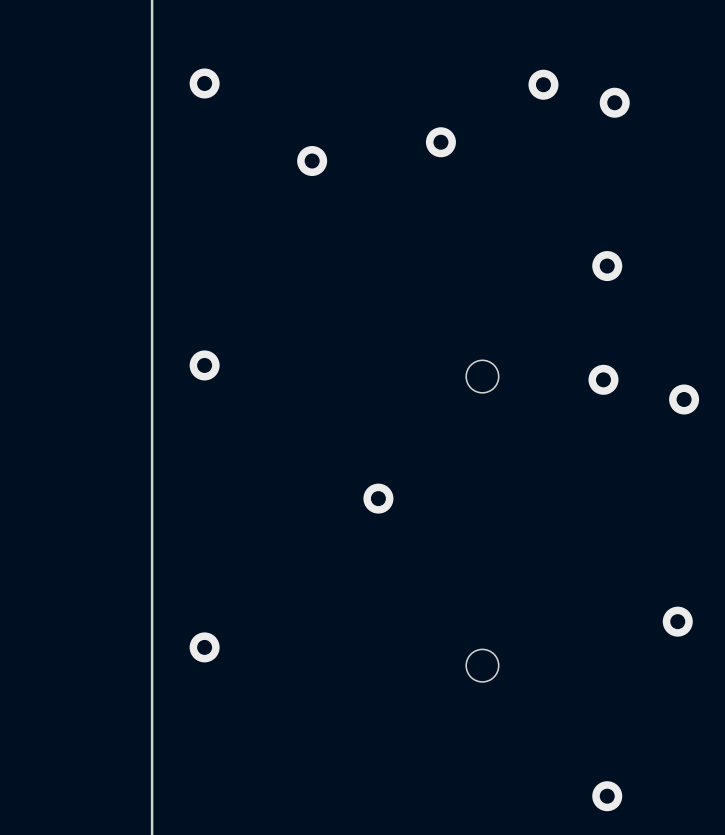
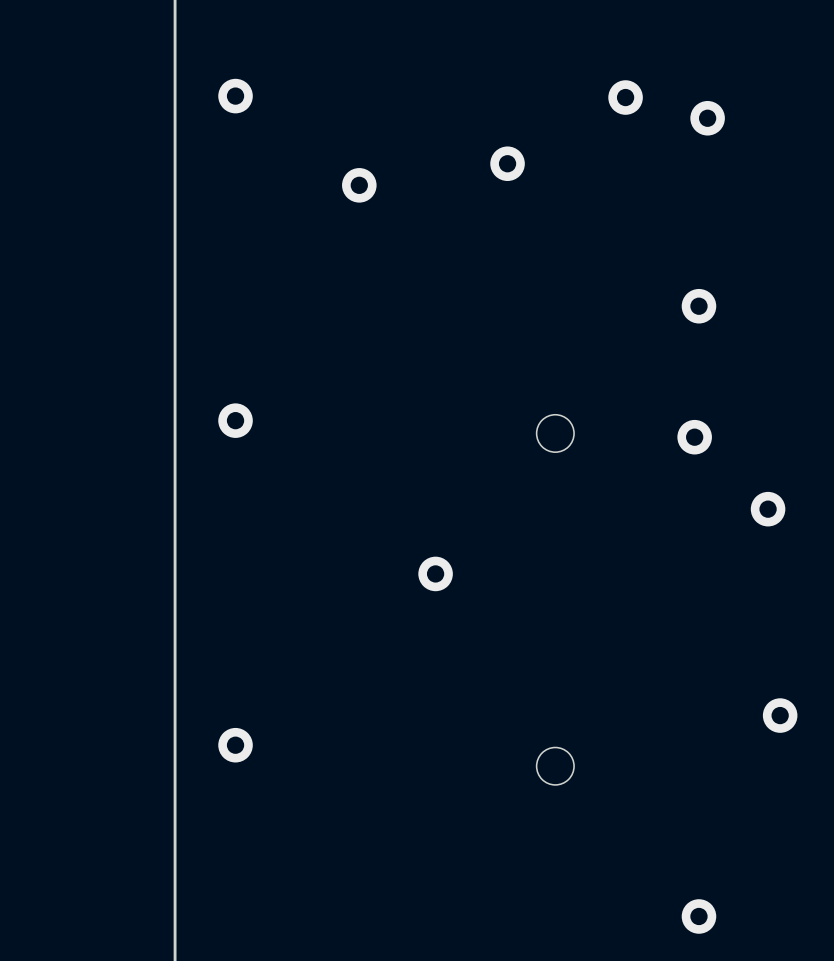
via position: (684, 399) -> (768, 509)

